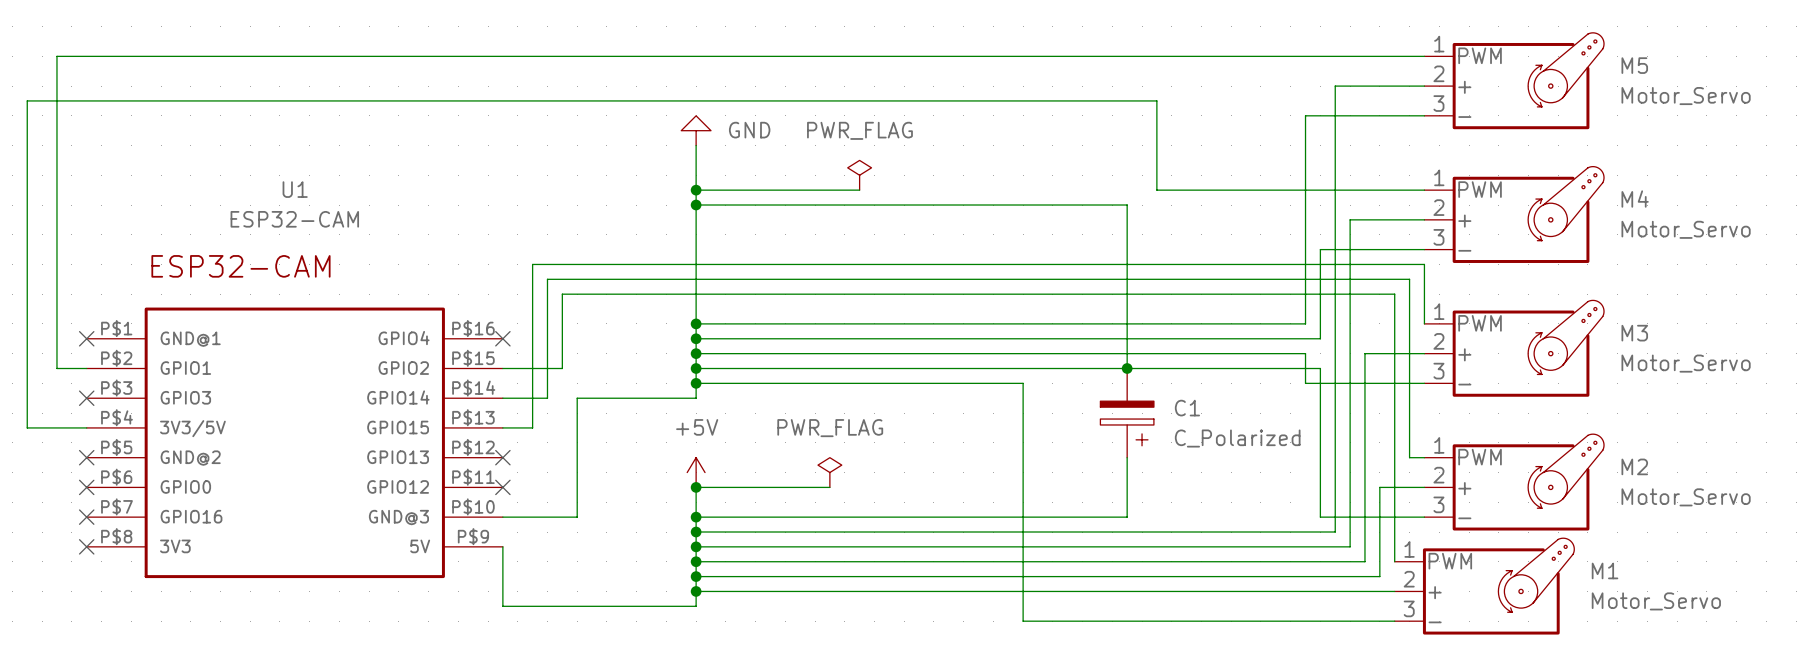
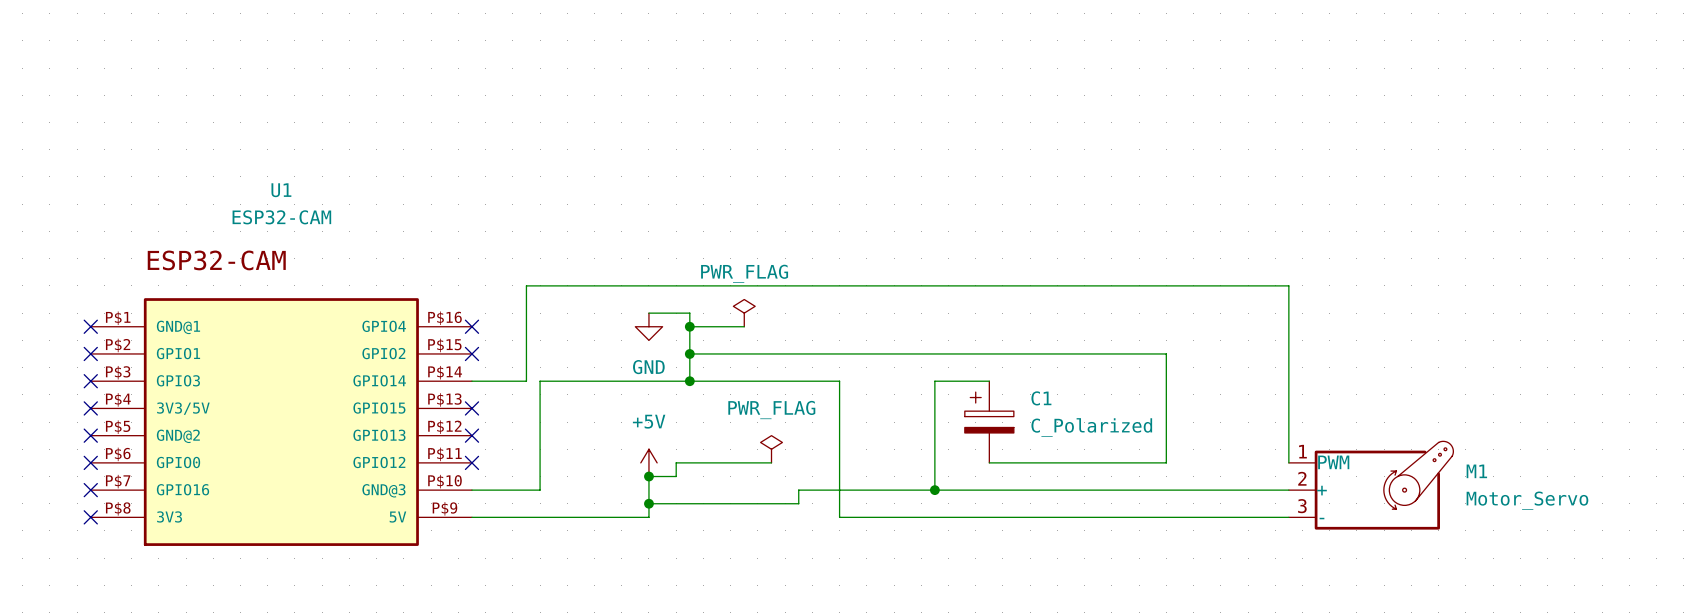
wire: (1424, 56) (56, 56) (56, 368) (86, 368) -> none
M5: Motor_Servo (1514, 81) -> none
wire: (1424, 86) (1335, 86) (1335, 532) (859, 532) -> none
wire: (1424, 115) (1305, 115) (1305, 323) (740, 323) -> (689, 381) (689, 313)
power symbol rotation: 0° (696, 130) -> 180° (648, 326)
power symbol position: GND (696, 130) -> GND (648, 326)
power symbol text position: GND (749, 130) -> GND (648, 367)
wire: (696, 145) (696, 398) -> (839, 517) (839, 381) (648, 381)
power symbol position: PWR_FLAG (859, 175) -> PWR_FLAG (744, 313)
wire: (696, 190) (859, 190) -> none
junction: (696, 190) -> none
wire: (1424, 190) (1156, 190) (1156, 100) (27, 100) (27, 427) (86, 427) -> none
wire: (696, 205) (1127, 205) (1127, 368) -> none
junction: (696, 205) -> none
M4: Motor_Servo (1514, 214) -> none
wire: (1424, 219) (1350, 219) (1350, 546) -> (1288, 517) (1248, 517)
wire: (1424, 249) (1320, 249) (1320, 338) (800, 338) -> none
junction: (696, 323) -> none
wire: (1424, 323) (1424, 264) (532, 264) (532, 427) (502, 427) -> none
wire: (696, 338) (740, 338) -> none
junction: (696, 338) -> none
junction: none -> (689, 326)
M3: Motor_Servo (1514, 348) -> none
wire: (696, 353) (1305, 353) (1305, 383) (1424, 383) -> none
junction: (696, 353) -> none
wire: (1424, 353) (1364, 353) (1364, 561) (696, 561) -> none
no-connect mark: none -> (90, 353)
wire: (502, 368) (562, 368) -> (512, 381) (526, 381) (526, 353)
no-connect mark: none -> (471, 353)
wire: (696, 368) (740, 368) -> none
junction: (696, 368) -> none
junction: none -> (689, 353)
junction: (1127, 368) -> none
wire: (1260, 368) (1320, 368) (1320, 517) -> (1043, 490) (1220, 490)
wire: none -> (1166, 353) (1166, 462) (989, 462)
wire: (696, 383) (1023, 383) (1023, 621) (1394, 621) -> none
junction: (696, 383) -> none
wire: (547, 398) (547, 279) (1409, 279) (1409, 457) (1424, 457) -> none
junction: none -> (689, 381)
wire: none -> (989, 381) (934, 381) (934, 490)
C1 position: (1127, 413) -> (989, 422)
C1 rotation: 0° (1127, 423) -> 180° (989, 412)
no-connect mark: none -> (90, 408)
no-connect mark: none -> (471, 408)
wire: (1127, 457) (1127, 517) -> none
power symbol position: +5V (696, 472) -> +5V (648, 462)
M2: Motor_Servo (1514, 482) -> none
junction: (696, 487) -> none
wire: (725, 487) (696, 487) (696, 502) -> (676, 462) (676, 476) (648, 476)
wire: (1394, 487) (1394, 561) -> none
wire: (1424, 487) (1379, 487) (1379, 576) (696, 576) -> none
junction: none -> (648, 476)
wire: (696, 517) (859, 517) -> (798, 503) (798, 490)
junction: (696, 517) -> none
junction: none -> (934, 490)
wire: (502, 546) (502, 606) (696, 606) (696, 546) (904, 546) -> (471, 517) (648, 517)
junction: (696, 546) -> none
junction: (696, 561) -> none
junction: (696, 576) -> none
M1 position: (1484, 586) -> (1371, 485)
wire: (696, 591) (1394, 591) -> none
junction: (696, 591) -> none

